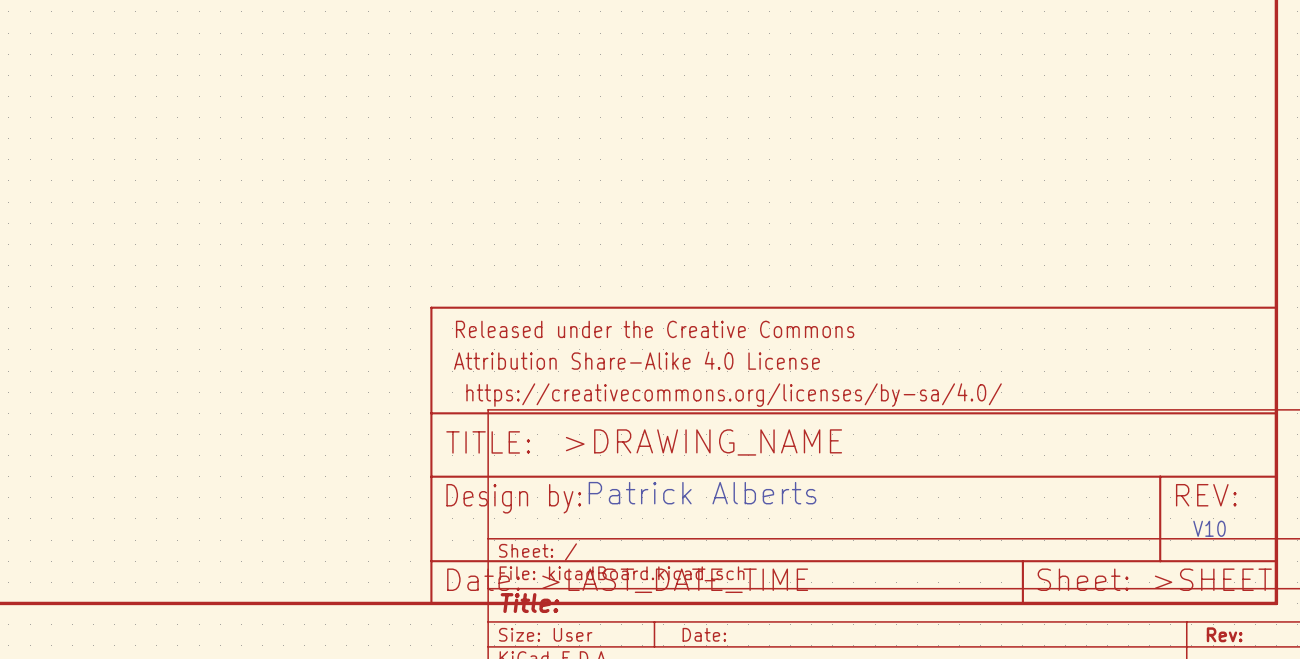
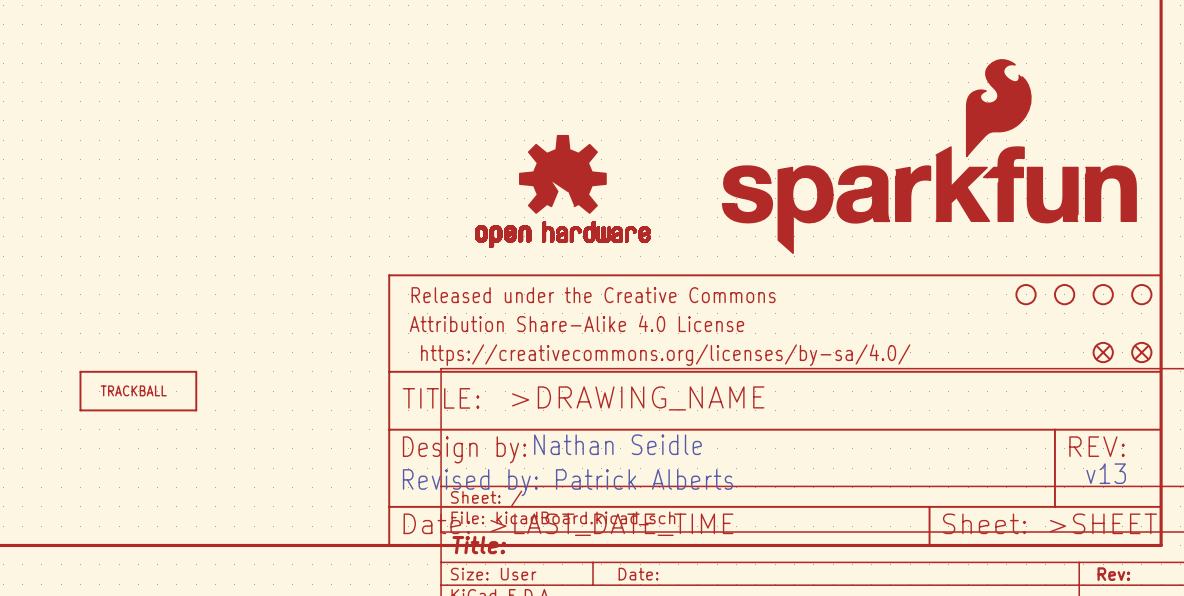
part: none -> (929, 156)
part: none -> (562, 191)
part: none -> (1026, 294)
part: none -> (1064, 294)
part: none -> (1103, 294)
part: none -> (1141, 294)
part: none -> (1103, 352)
part: none -> (1141, 352)
part: none -> (138, 391)
text: Patrick Alberts (702, 493) -> Nathan Seidle (617, 444)
text: V10 (1209, 528) -> v13 (1106, 473)
text: none -> Revised by: Patrick Alberts (567, 482)

